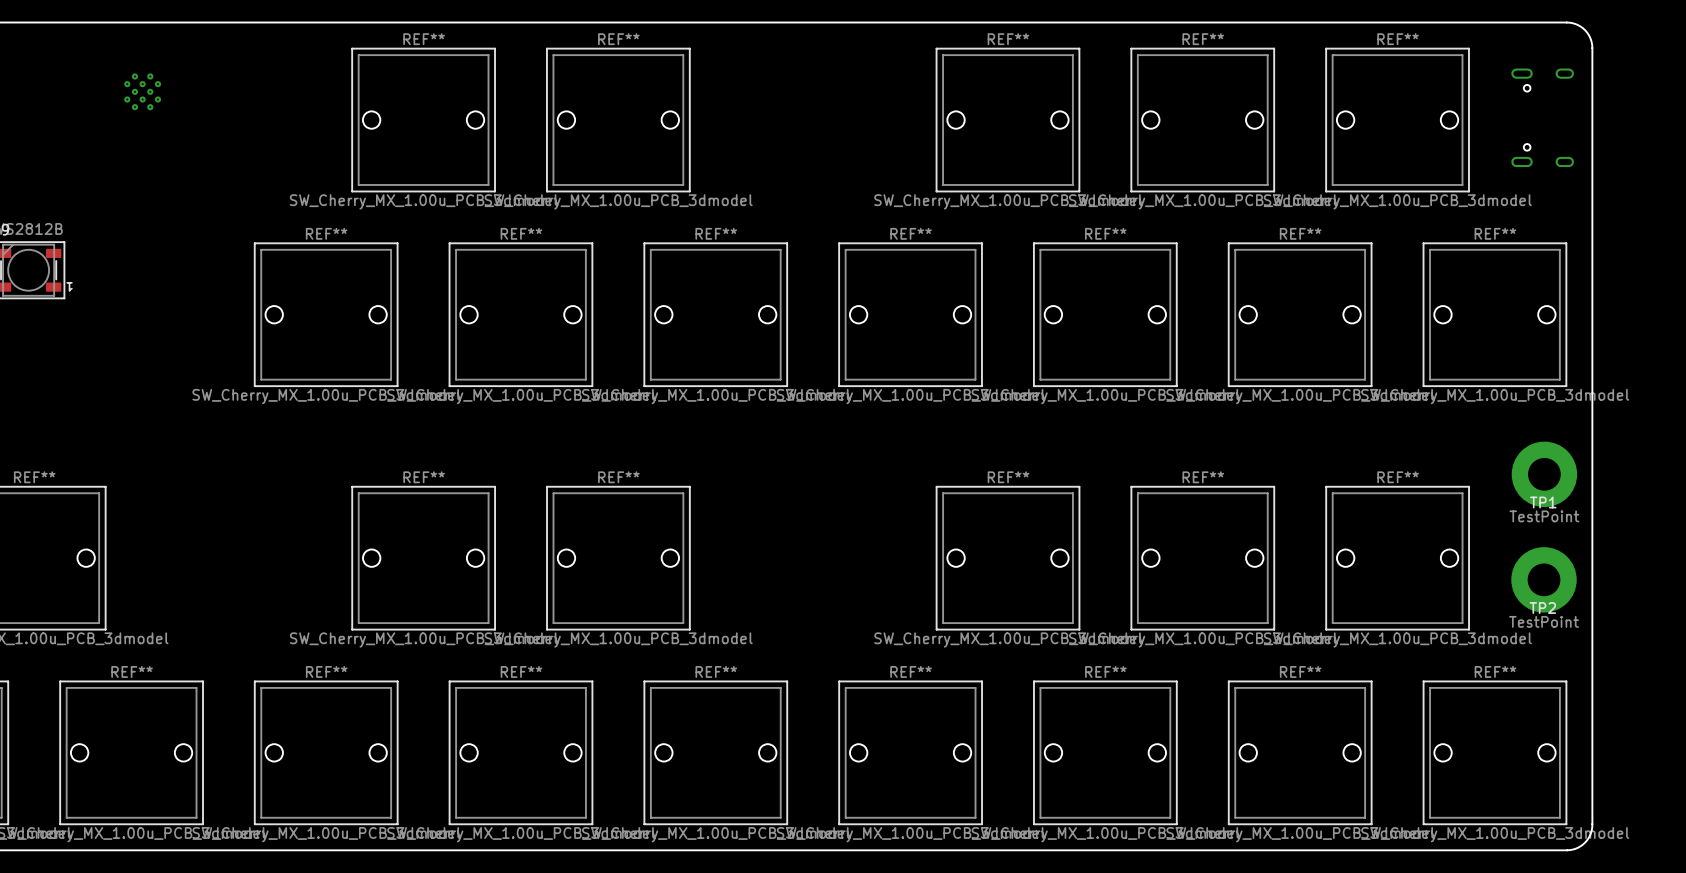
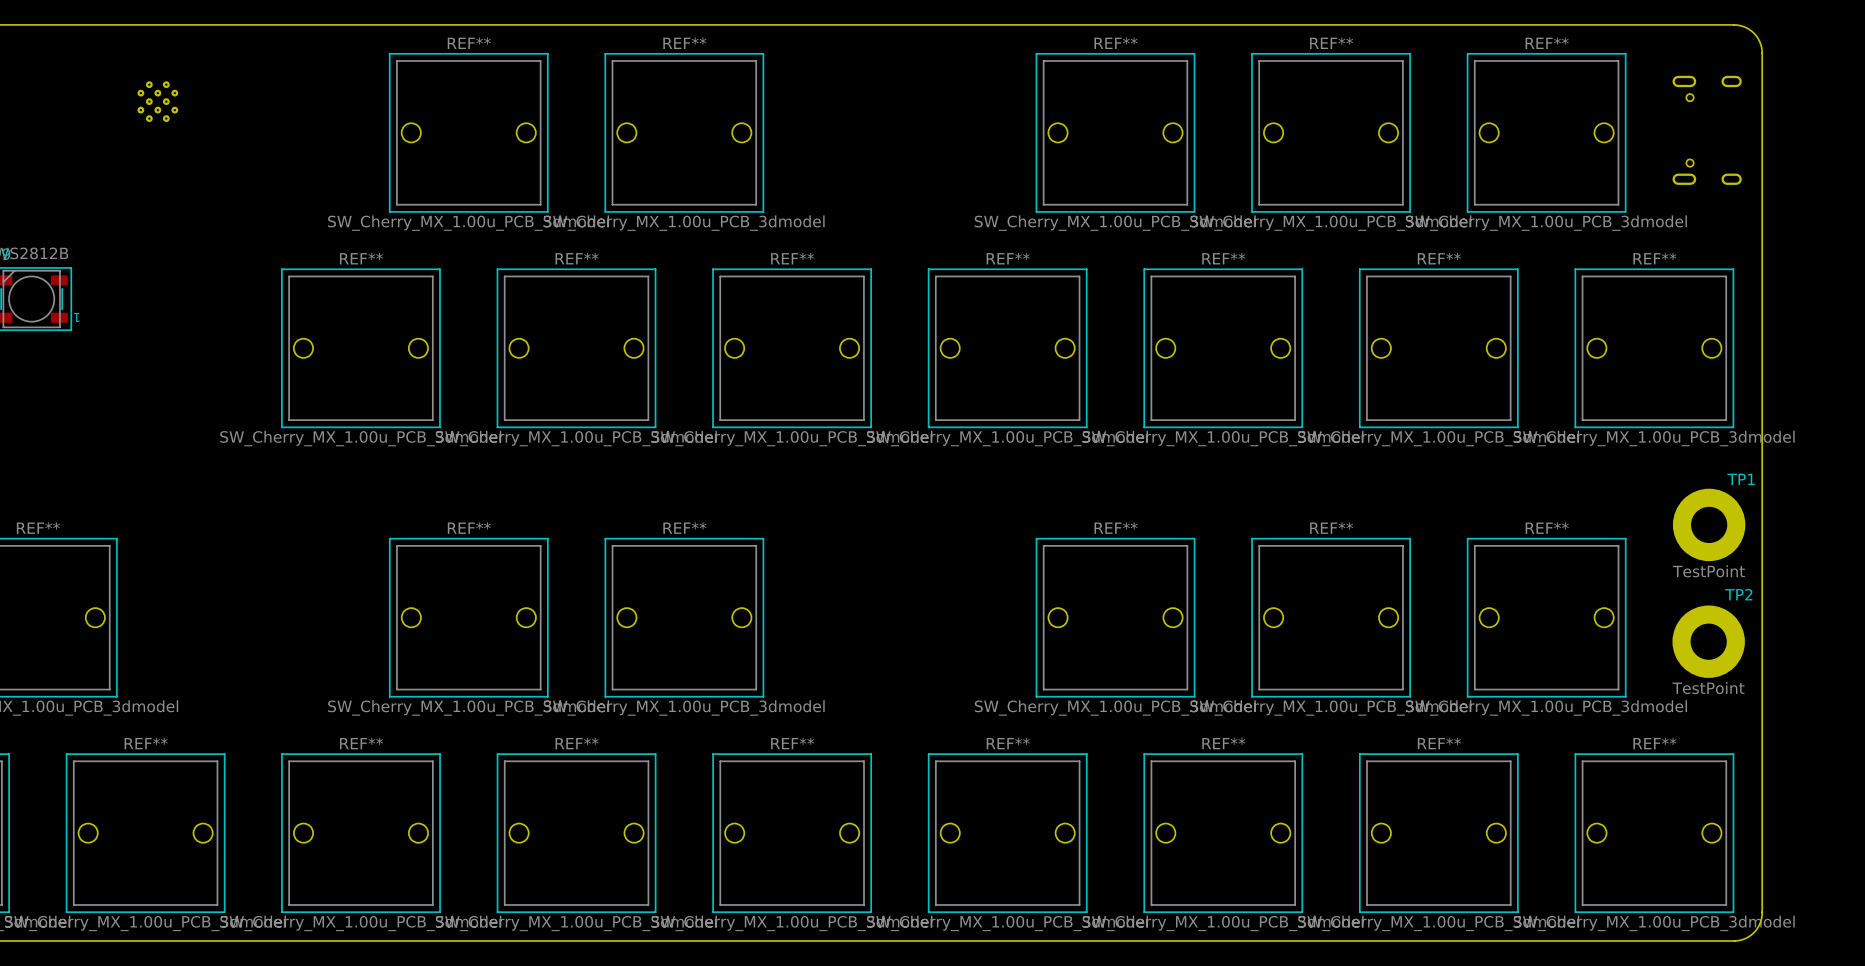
TP1 name position: TP1 (1543, 502) -> TP1 (1741, 479)
TP2 name position: TP2 (1542, 607) -> TP2 (1738, 594)

